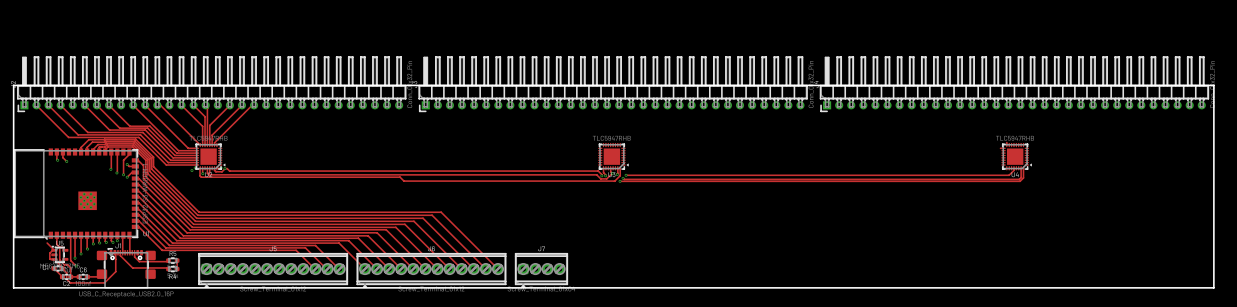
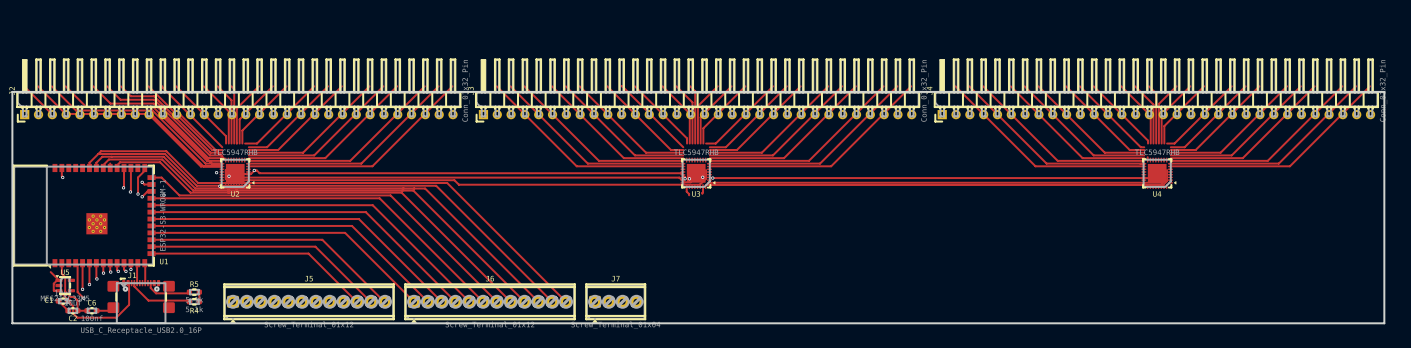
track: none -> (24, 86) (50, 112)
track: none -> (37, 86) (65, 113) (151, 113) (203, 166) (222, 166)
track: none -> (51, 86) (76, 110) (152, 110) (205, 163) (222, 163)
track: none -> (65, 86) (86, 107) (153, 107) (207, 160) (222, 160)
track: none -> (93, 86) (110, 103) (153, 103) (208, 158) (222, 158)
track: none -> (107, 86) (120, 99) (154, 99) (209, 155) (222, 155)
track: none -> (120, 86) (130, 96) (154, 96) (210, 152) (222, 152)
track: none -> (148, 86) (212, 149) (222, 149)
track: none -> (162, 86) (222, 147)
track: none -> (176, 86) (226, 136) (226, 143)
track: none -> (203, 86) (228, 111) (228, 143)
track: none -> (217, 86) (231, 100) (231, 143)
track: none -> (231, 86) (234, 89) (234, 143)
track: none -> (259, 86) (236, 108) (236, 143)
track: none -> (272, 86) (239, 119) (239, 143)
track: none -> (286, 86) (242, 130) (242, 143)
track: none -> (314, 86) (257, 143) (245, 143)
track: none -> (328, 86) (267, 147) (248, 147)
track: none -> (341, 86) (278, 149) (248, 149)
track: none -> (369, 86) (303, 152) (248, 152)
track: none -> (383, 86) (314, 155) (248, 155)
track: none -> (397, 86) (325, 158) (248, 158)
track: none -> (424, 86) (350, 160) (248, 160)
track: none -> (438, 86) (361, 163) (248, 163)
track: none -> (452, 86) (372, 166) (248, 166)
track: none -> (496, 86) (576, 166) (683, 166)
track: none -> (510, 86) (587, 163) (683, 163)
track: none -> (524, 86) (598, 160) (683, 160)
track: none -> (551, 86) (623, 158) (683, 158)
track: none -> (565, 86) (634, 155) (683, 155)
track: none -> (579, 86) (646, 152) (683, 152)
track: none -> (607, 86) (670, 149) (683, 149)
track: none -> (621, 86) (683, 147)
track: none -> (634, 86) (687, 138) (687, 143)
track: none -> (662, 86) (689, 113) (689, 143)
track: none -> (676, 86) (692, 102) (692, 143)
track: none -> (690, 86) (695, 91) (695, 143)
track: none -> (717, 86) (697, 106) (697, 143)
track: none -> (731, 86) (700, 117) (700, 143)
track: none -> (745, 86) (703, 128) (703, 143)
track: none -> (773, 86) (715, 143) (706, 143)
track: none -> (786, 86) (725, 147) (709, 147)
track: none -> (800, 86) (736, 149) (709, 149)
track: none -> (828, 86) (761, 152) (709, 152)
track: none -> (842, 86) (772, 155) (709, 155)
track: none -> (855, 86) (784, 158) (709, 158)
track: none -> (883, 86) (808, 160) (709, 160)
track: none -> (897, 86) (820, 163) (709, 163)
track: none -> (911, 86) (831, 166) (709, 166)
track: none -> (955, 86) (1035, 166) (1144, 166)
track: none -> (969, 86) (1046, 163) (1144, 163)
track: none -> (983, 86) (1057, 160) (1144, 160)
track: none -> (1010, 86) (1082, 158) (1144, 158)
track: none -> (1024, 86) (1093, 155) (1144, 155)
track: none -> (1038, 86) (1104, 152) (1144, 152)
track: none -> (1066, 86) (1129, 149) (1144, 149)
track: none -> (1079, 86) (1140, 147) (1144, 147)
track: none -> (1093, 86) (1148, 140) (1148, 143)
track: none -> (1121, 86) (1150, 115) (1150, 143)
track: none -> (1135, 86) (1153, 104) (1153, 143)
track: none -> (1148, 86) (1156, 93) (1156, 143)
track: none -> (1176, 86) (1158, 103) (1158, 143)
track: none -> (1190, 86) (1161, 114) (1161, 143)
track: none -> (1204, 86) (1164, 126) (1164, 143)
track: none -> (1231, 86) (1174, 143) (1167, 143)
track: none -> (1245, 86) (1184, 147) (1170, 147)
track: none -> (1259, 86) (1195, 149) (1170, 149)
track: none -> (1287, 86) (1220, 152) (1170, 152)
track: none -> (1300, 86) (1231, 155) (1170, 155)
track: none -> (1314, 86) (1242, 158) (1170, 158)
track: none -> (1342, 86) (1267, 160) (1170, 160)
track: none -> (1356, 86) (1278, 163) (1170, 163)
track: none -> (1369, 86) (1289, 166) (1170, 166)
track: (36, 105) (68, 137) (138, 137) (166, 164) (196, 164) -> none
track: (48, 105) (78, 134) (140, 134) (168, 162) (196, 162) -> none
track: (60, 105) (87, 132) (142, 132) (170, 160) (196, 160) -> none
track: (84, 105) (109, 130) (145, 130) (173, 157) (196, 157) -> none
track: (96, 105) (119, 128) (147, 128) (174, 155) (196, 155) -> none
track: (109, 105) (129, 126) (149, 126) (176, 153) (196, 153) -> none
track: (181, 105) (202, 126) (202, 145) -> none
track: (193, 105) (205, 116) (205, 145) -> none
track: (229, 105) (209, 125) (209, 144) -> none
track: (241, 105) (212, 135) (212, 145) -> none
track: (254, 105) (214, 142) (214, 145) -> none
track: (207, 107) (207, 145) -> none
track: (104, 139) (135, 139) (153, 157) (153, 166) (199, 212) (441, 212) -> (98, 153) (101, 151) (166, 151) (198, 183) (447, 183) (501, 236)
track: (104, 142) (135, 141) (151, 157) (151, 169) (197, 215) (432, 215) -> (116, 153) (164, 153) (196, 185) (436, 185) (490, 240)
track: (104, 144) (134, 143) (149, 158) (149, 171) (196, 218) (423, 218) -> (116, 156) (163, 156) (195, 188) (425, 188) (480, 243)
track: (132, 146) (145, 160) (145, 176) (193, 224) (404, 224) -> (148, 162) (160, 162) (190, 192) (401, 192) (459, 250)
track: (99, 148) (107, 145) (133, 145) (147, 159) (147, 173) (195, 221) (413, 221) -> (116, 159) (162, 159) (193, 190) (413, 190) (470, 247)
track: (62, 151) (62, 157) (66, 161) -> none
via: none -> (254, 170)
via: none -> (216, 172)
via: none -> (229, 176)
track: (138, 160) (143, 165) (143, 178) (192, 227) (395, 227) -> (154, 177) (161, 177) (179, 195) (390, 195) (449, 254)
via: none -> (702, 177)
via: none -> (712, 178)
via: (66, 161) -> none
via: none -> (685, 178)
via: none -> (689, 178)
track: (200, 168) (201, 177) (400, 177) (403, 181) (614, 181) -> (226, 170) (227, 180) (454, 180) (458, 184) (699, 184)
track: (207, 168) (208, 174) (596, 174) (600, 178) (606, 178) (612, 173) (610, 168) -> (234, 170) (236, 177) (679, 177) (683, 182) (690, 182) (696, 175) (695, 170)
track: (214, 168) (215, 171) (222, 171) (224, 168) (229, 171) (598, 171) (601, 175) -> (242, 170) (243, 174) (250, 174) (254, 170) (259, 173) (681, 173) (685, 178)
via: (224, 168) -> none
track: (620, 168) (620, 175) (614, 181) -> (706, 170) (706, 178) (699, 184)
track: (1013, 168) (1009, 175) (626, 175) -> (1156, 170) (1150, 178) (712, 178)
track: (1021, 168) (1019, 179) (623, 178) -> (1164, 170) (1164, 180) (1162, 182) (709, 181)
track: (1023, 168) (1023, 177) (1020, 181) (620, 181) -> (1167, 170) (1167, 181) (1163, 184) (705, 184)
via: (191, 170) -> none
via: (202, 173) -> none
via: (612, 173) -> none
via: (617, 174) -> none
via: none -> (163, 195)
via: (601, 175) -> none
via: (605, 175) -> none
via: (626, 175) -> none
track: (138, 178) (190, 229) (386, 229) -> (155, 198) (379, 198) (438, 256)
via: (623, 178) -> none
via: (620, 181) -> none
track: (138, 184) (187, 232) (377, 232) -> (155, 205) (372, 205) (427, 260)
track: (138, 190) (183, 235) (368, 235) -> (154, 212) (365, 212) (417, 263)
track: (138, 196) (180, 238) (358, 238) -> (155, 219) (358, 219) (406, 266)
track: (138, 202) (176, 240) (348, 240) -> (155, 225) (352, 225) (395, 269)
track: (138, 208) (172, 243) (339, 243) -> (154, 232) (345, 232) (384, 272)
track: (138, 214) (169, 245) (315, 245) -> (155, 239) (322, 239) (357, 274)
track: (138, 220) (165, 247) (305, 247) (327, 269) -> (155, 246) (315, 246) (371, 302)
track: (138, 226) (162, 250) (296, 250) -> (155, 253) (308, 253) (335, 280)

